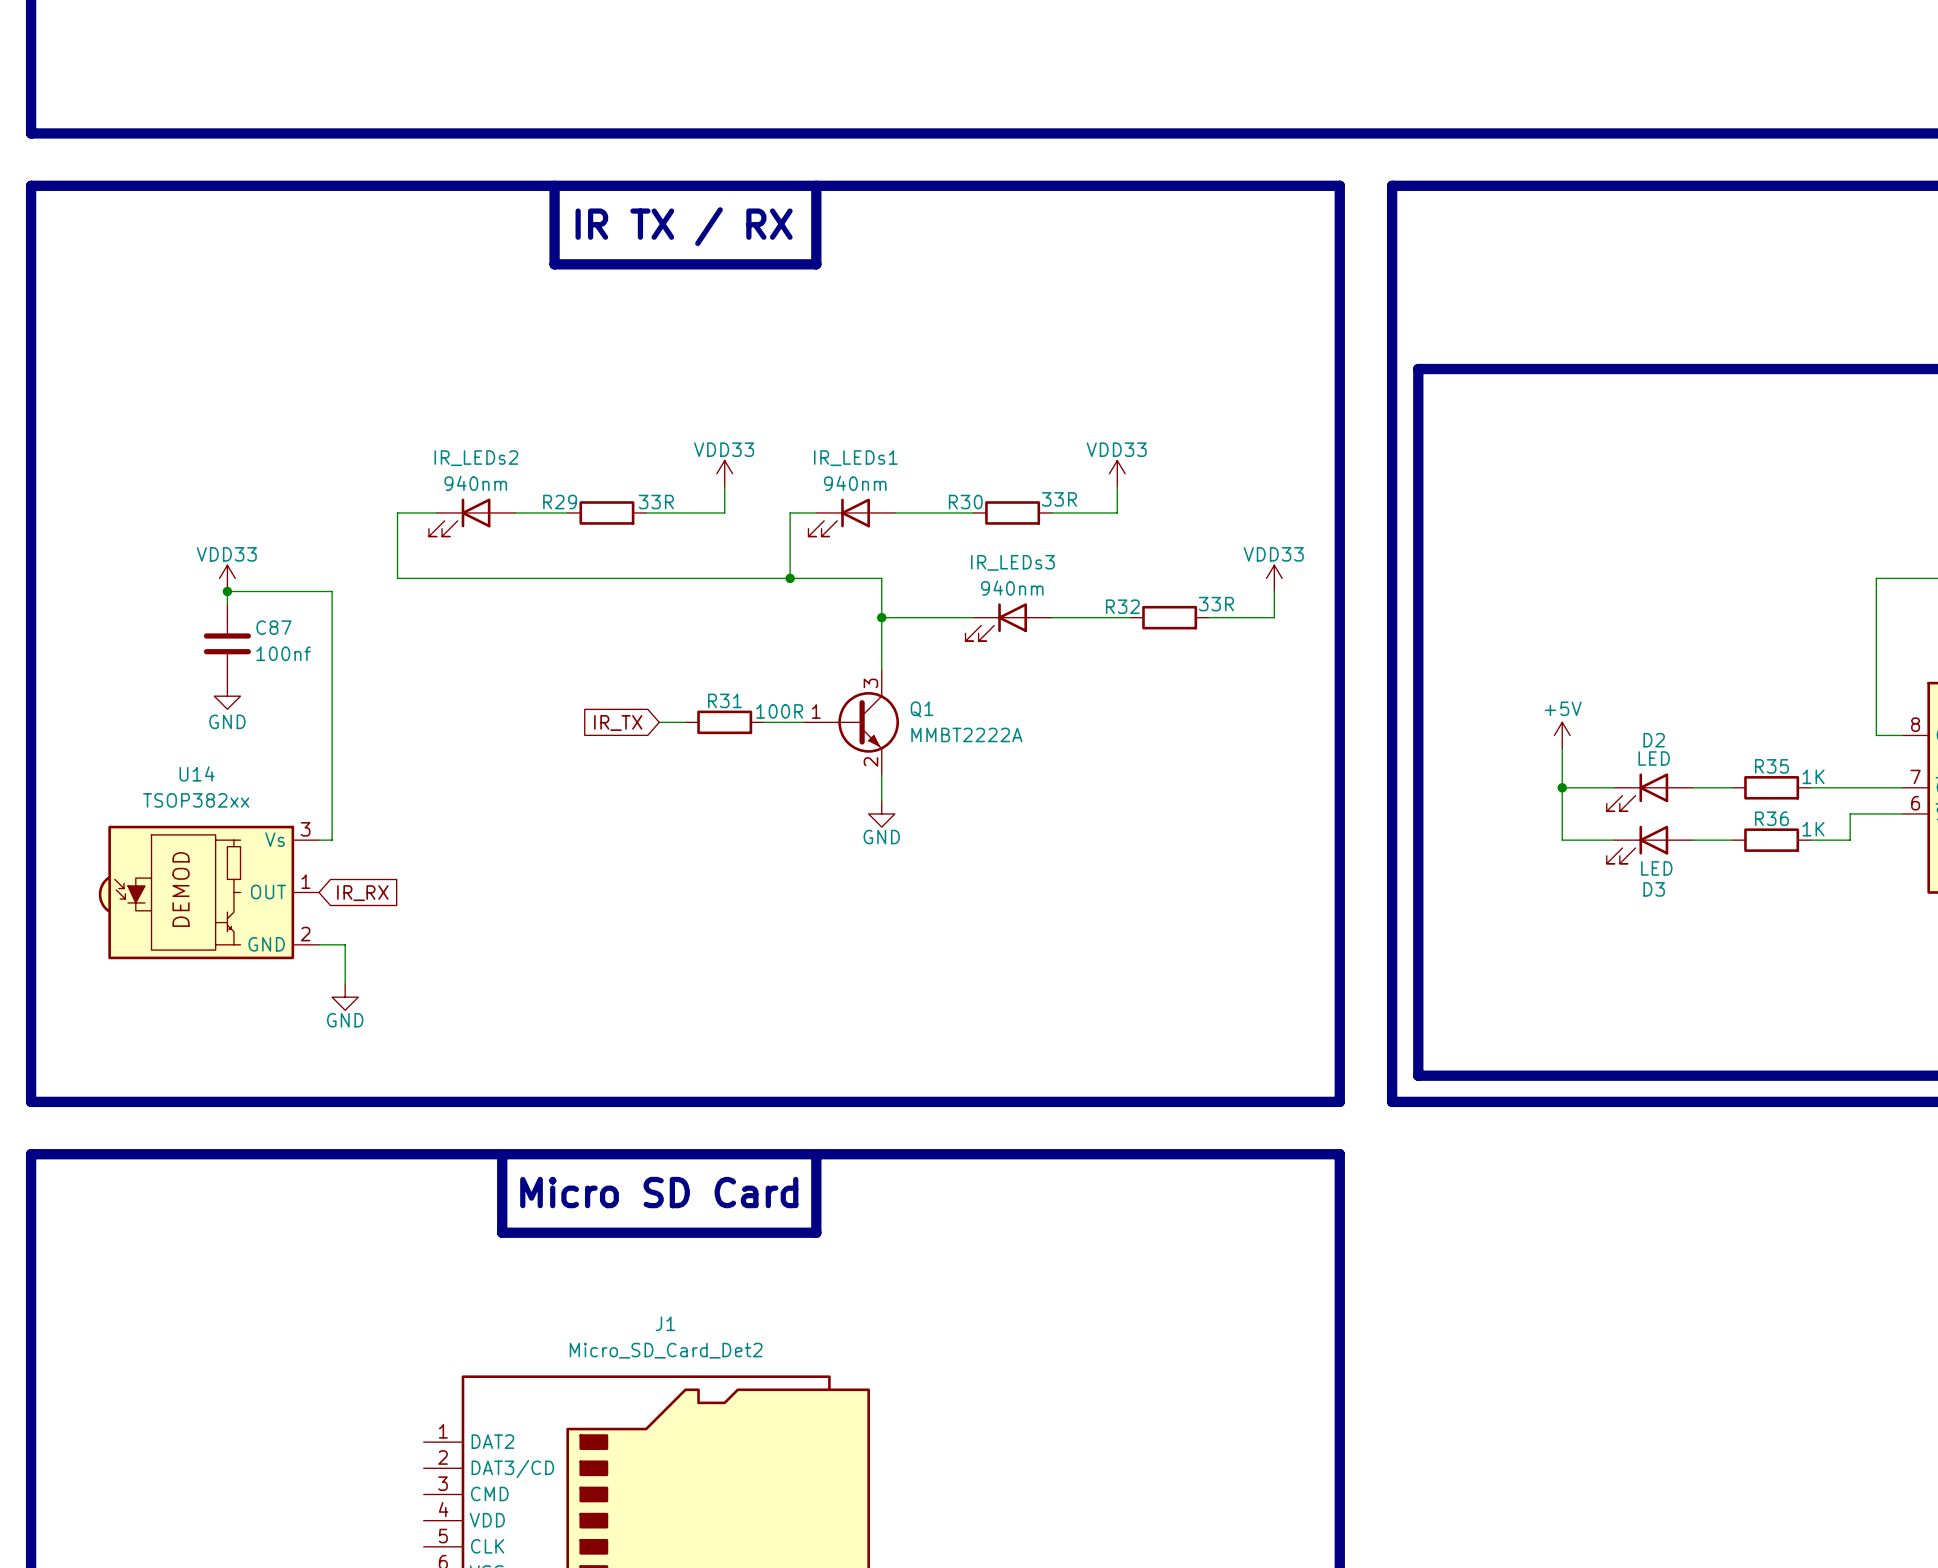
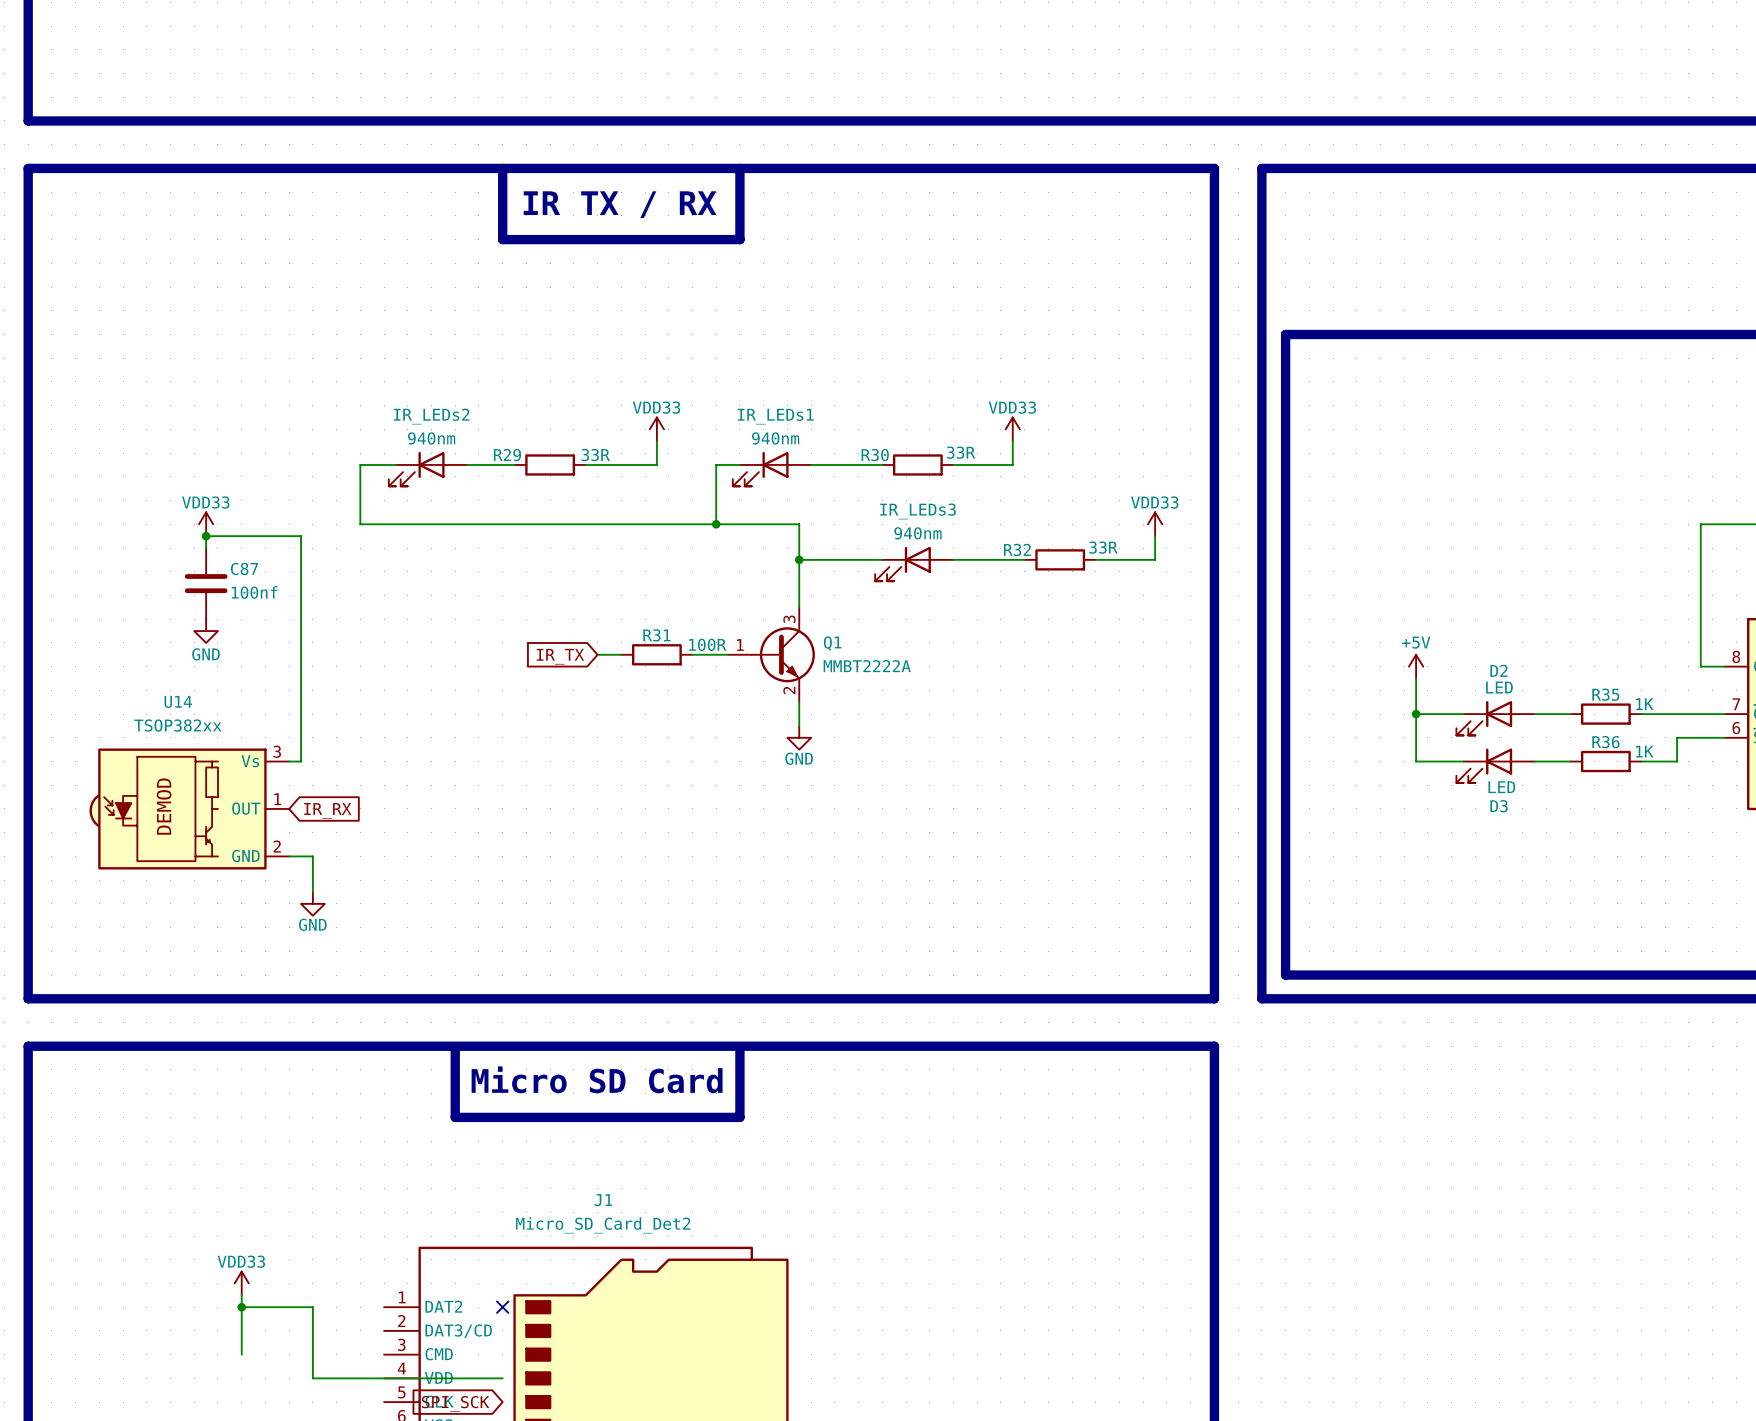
power symbol: none -> VDD33 (241, 1283)
wire: none -> (241, 1295) (241, 1354)
wire: none -> (241, 1307) (312, 1307) (312, 1378) (502, 1378)
junction: none -> (241, 1307)
no-connect mark: none -> (502, 1307)
global label: none -> SPI_SCK (455, 1403)

